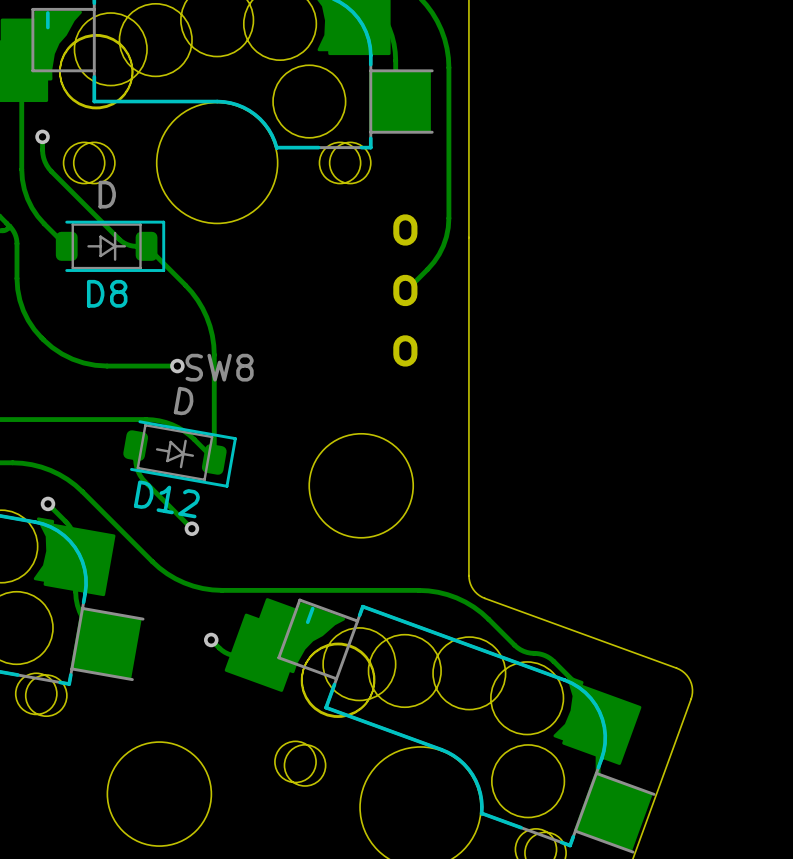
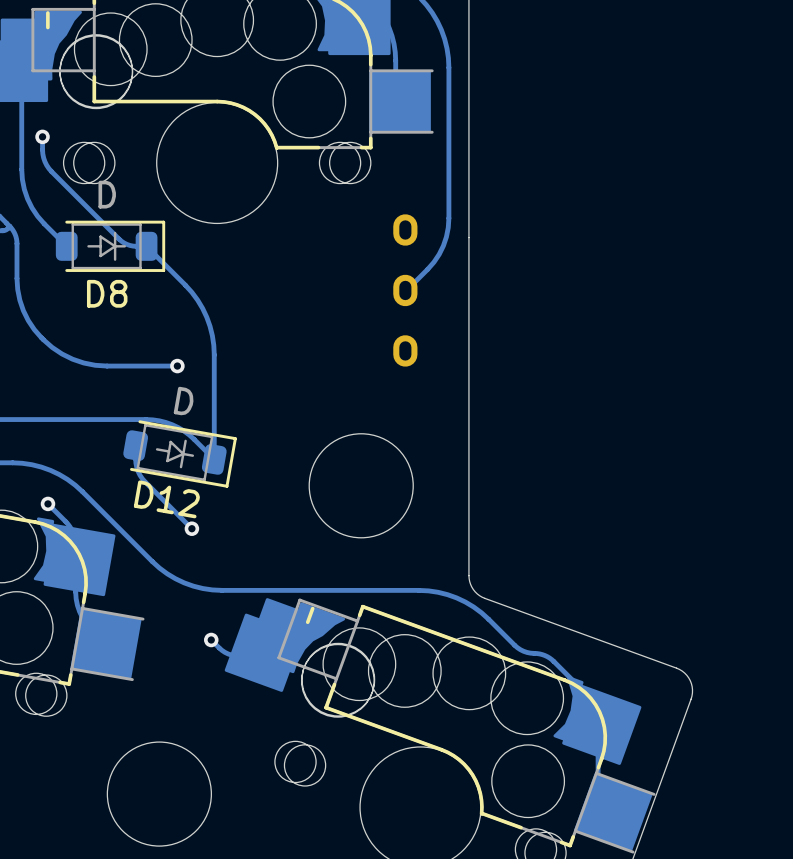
SW8 name: SW8 (219, 367) -> none

